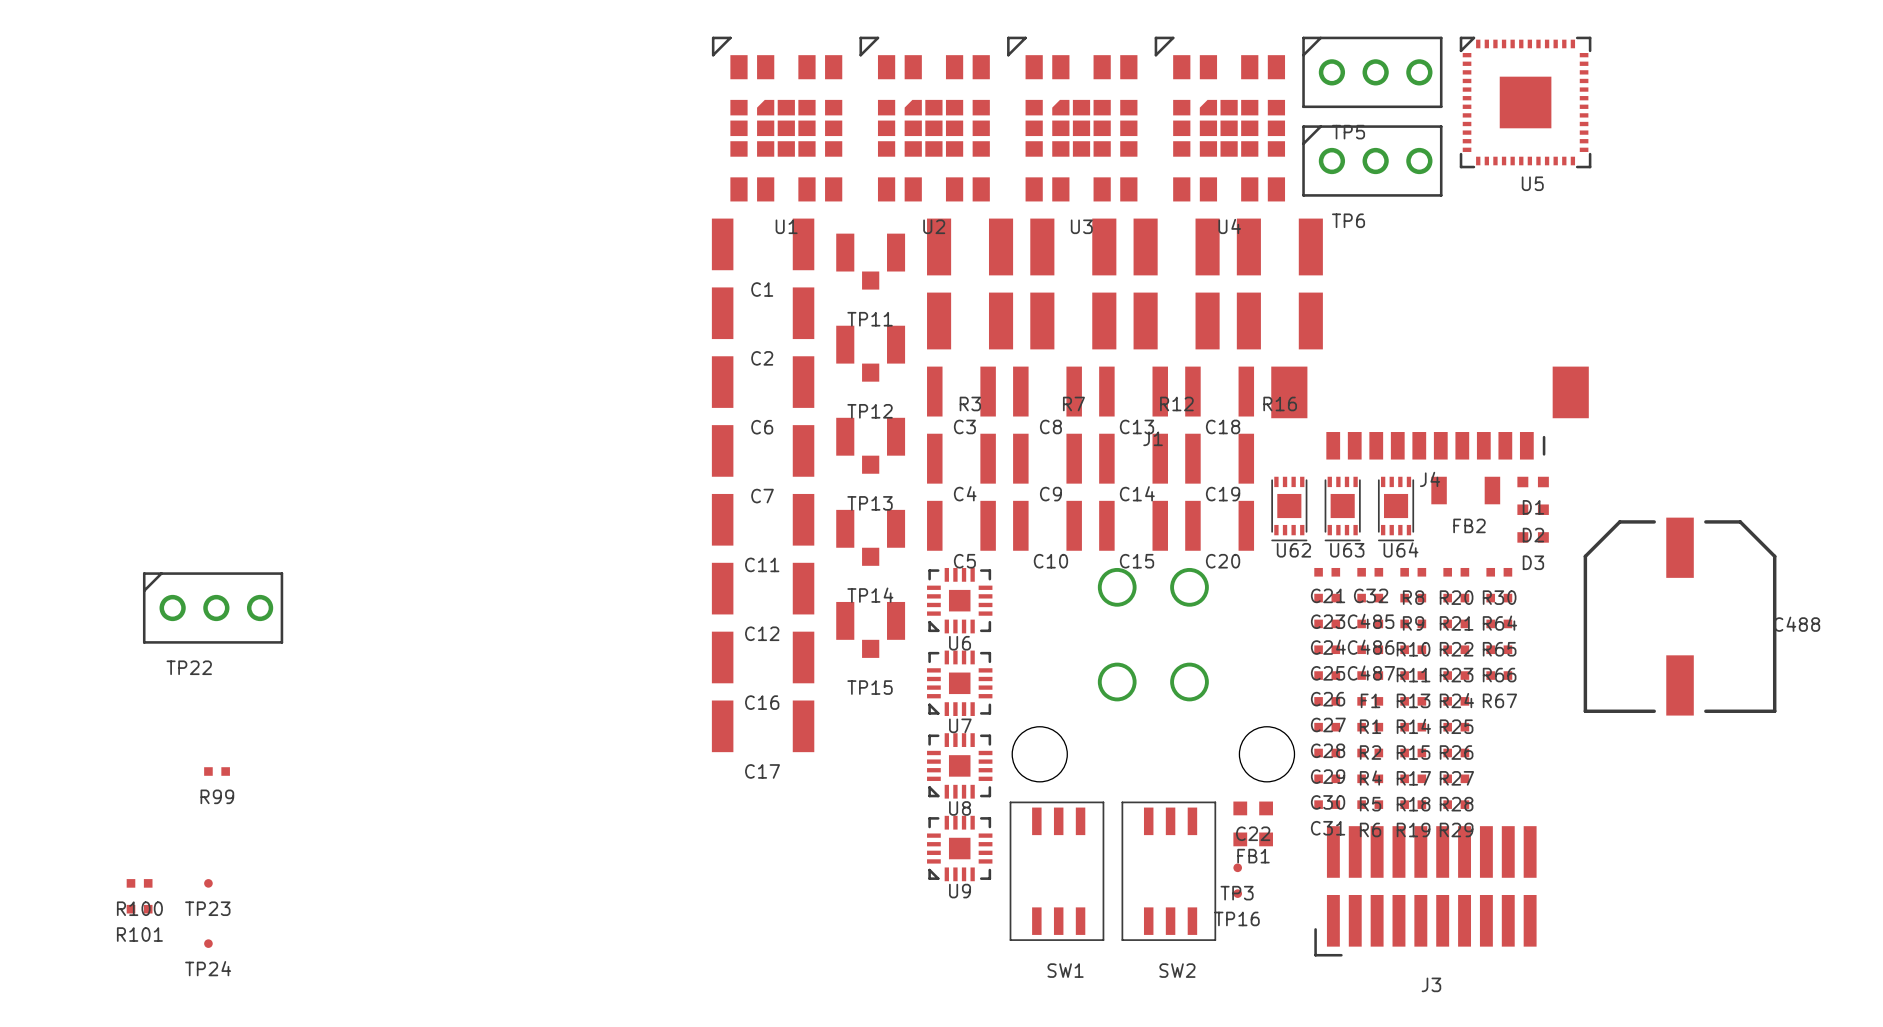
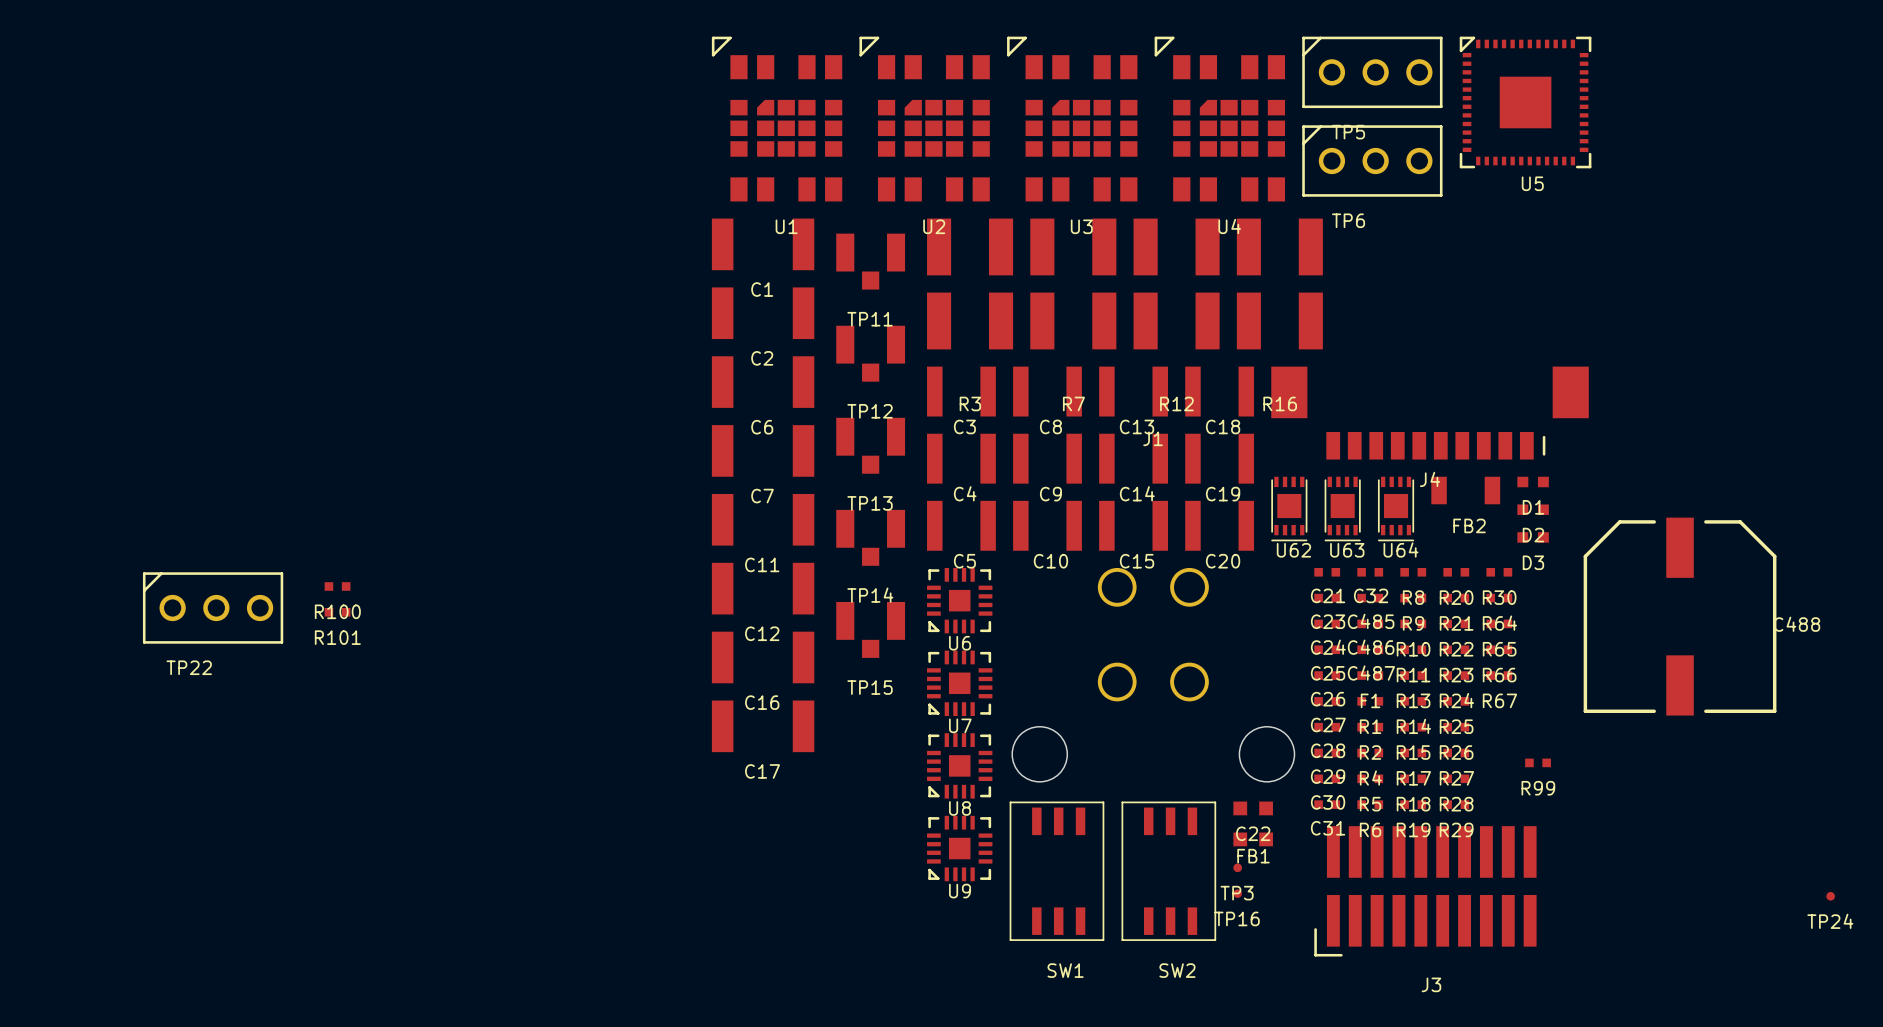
R99 position: (217, 771) -> (1538, 762)
R100 position: (139, 883) -> (337, 586)
TP23: (208, 883) -> none
R101 position: (139, 909) -> (337, 612)
TP24 position: (208, 943) -> (1830, 896)

